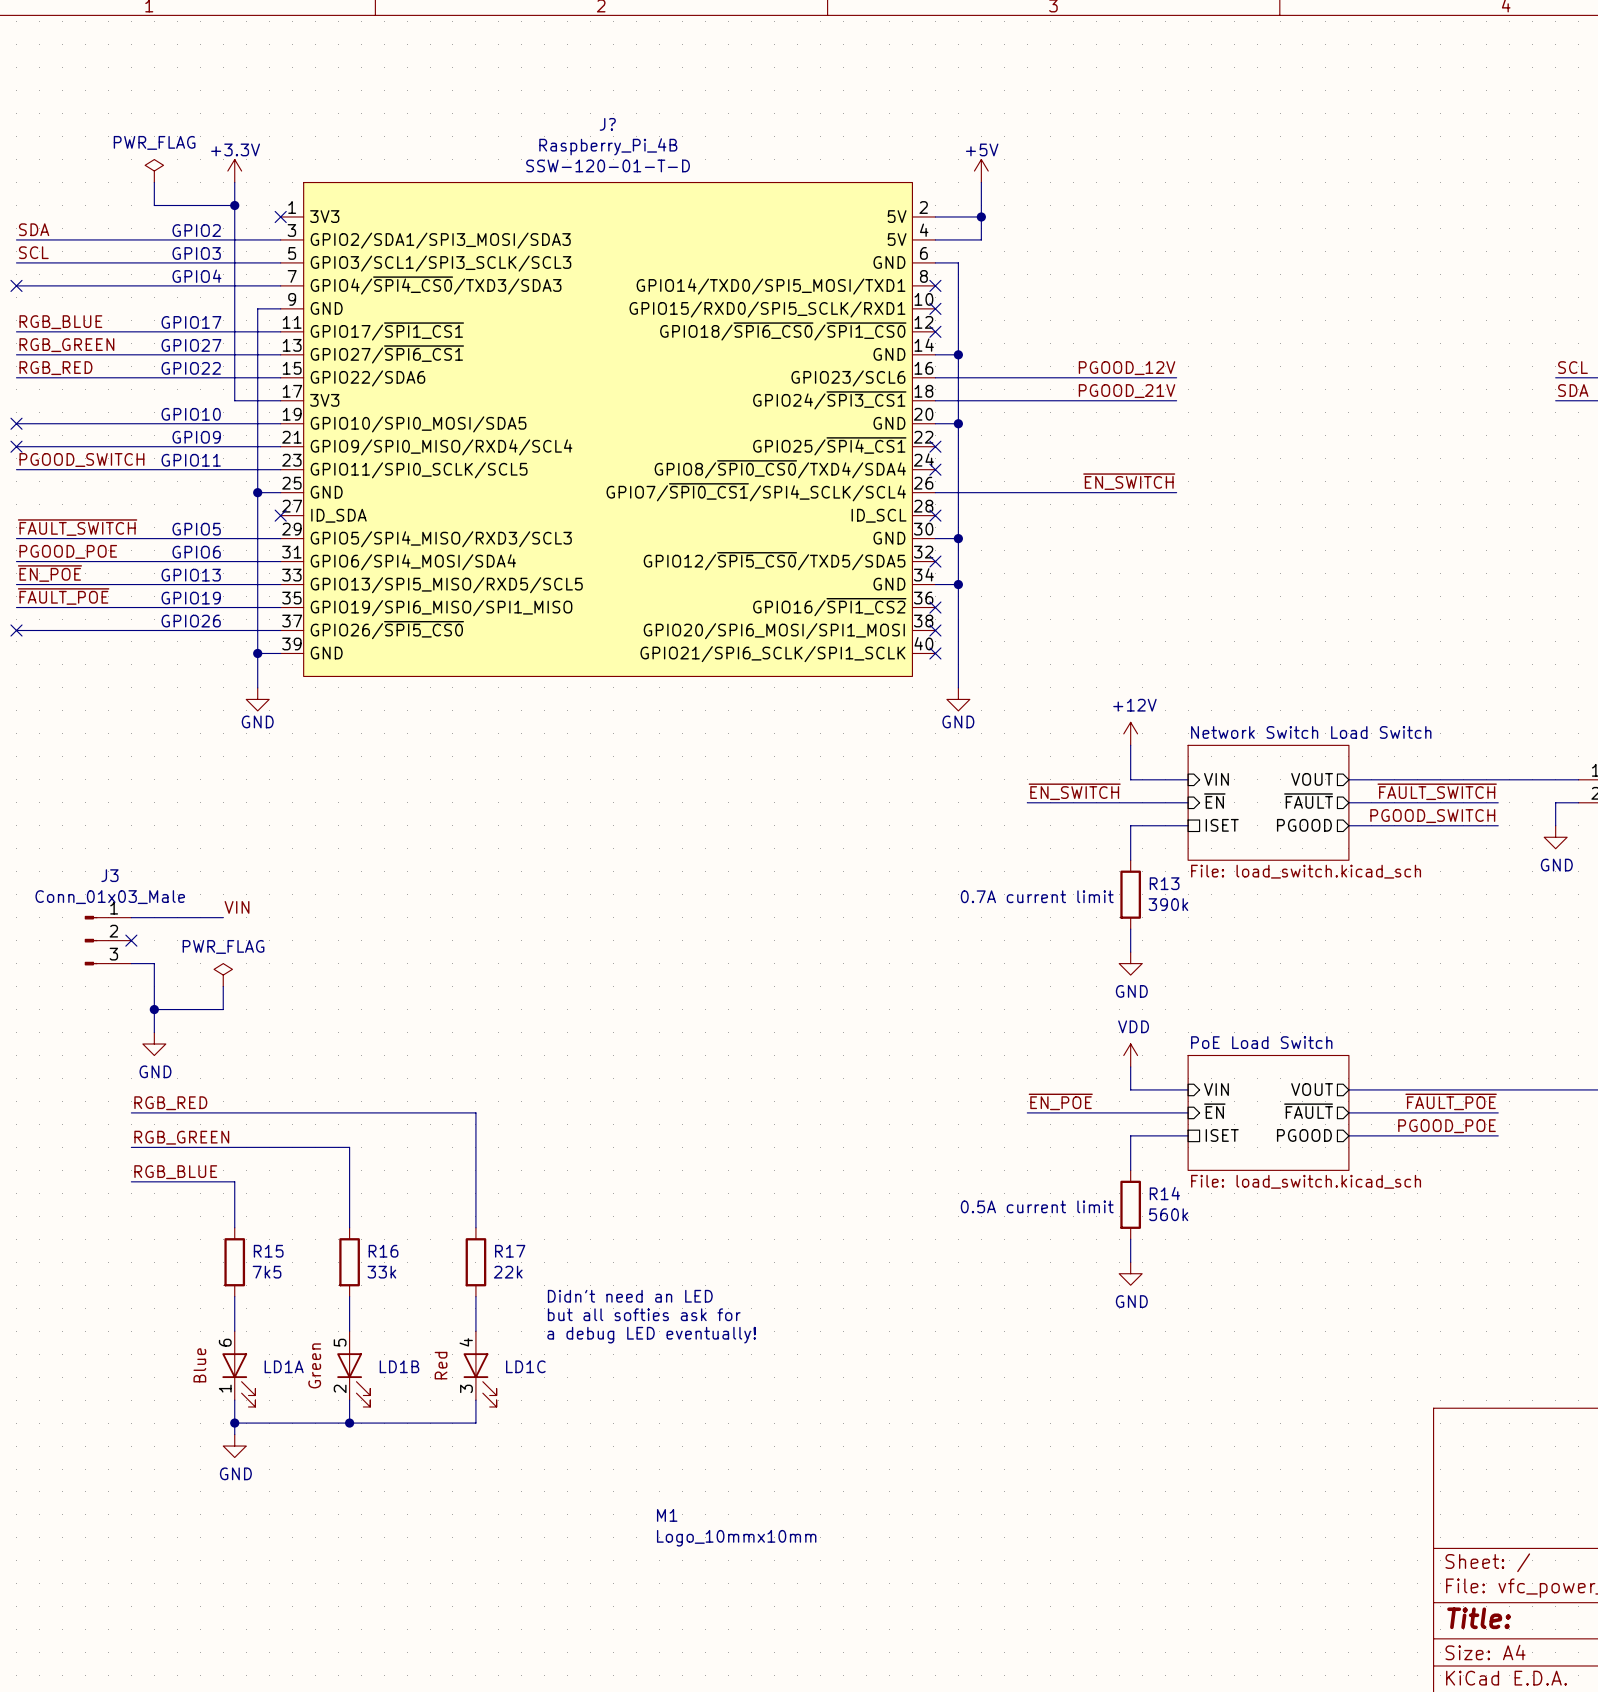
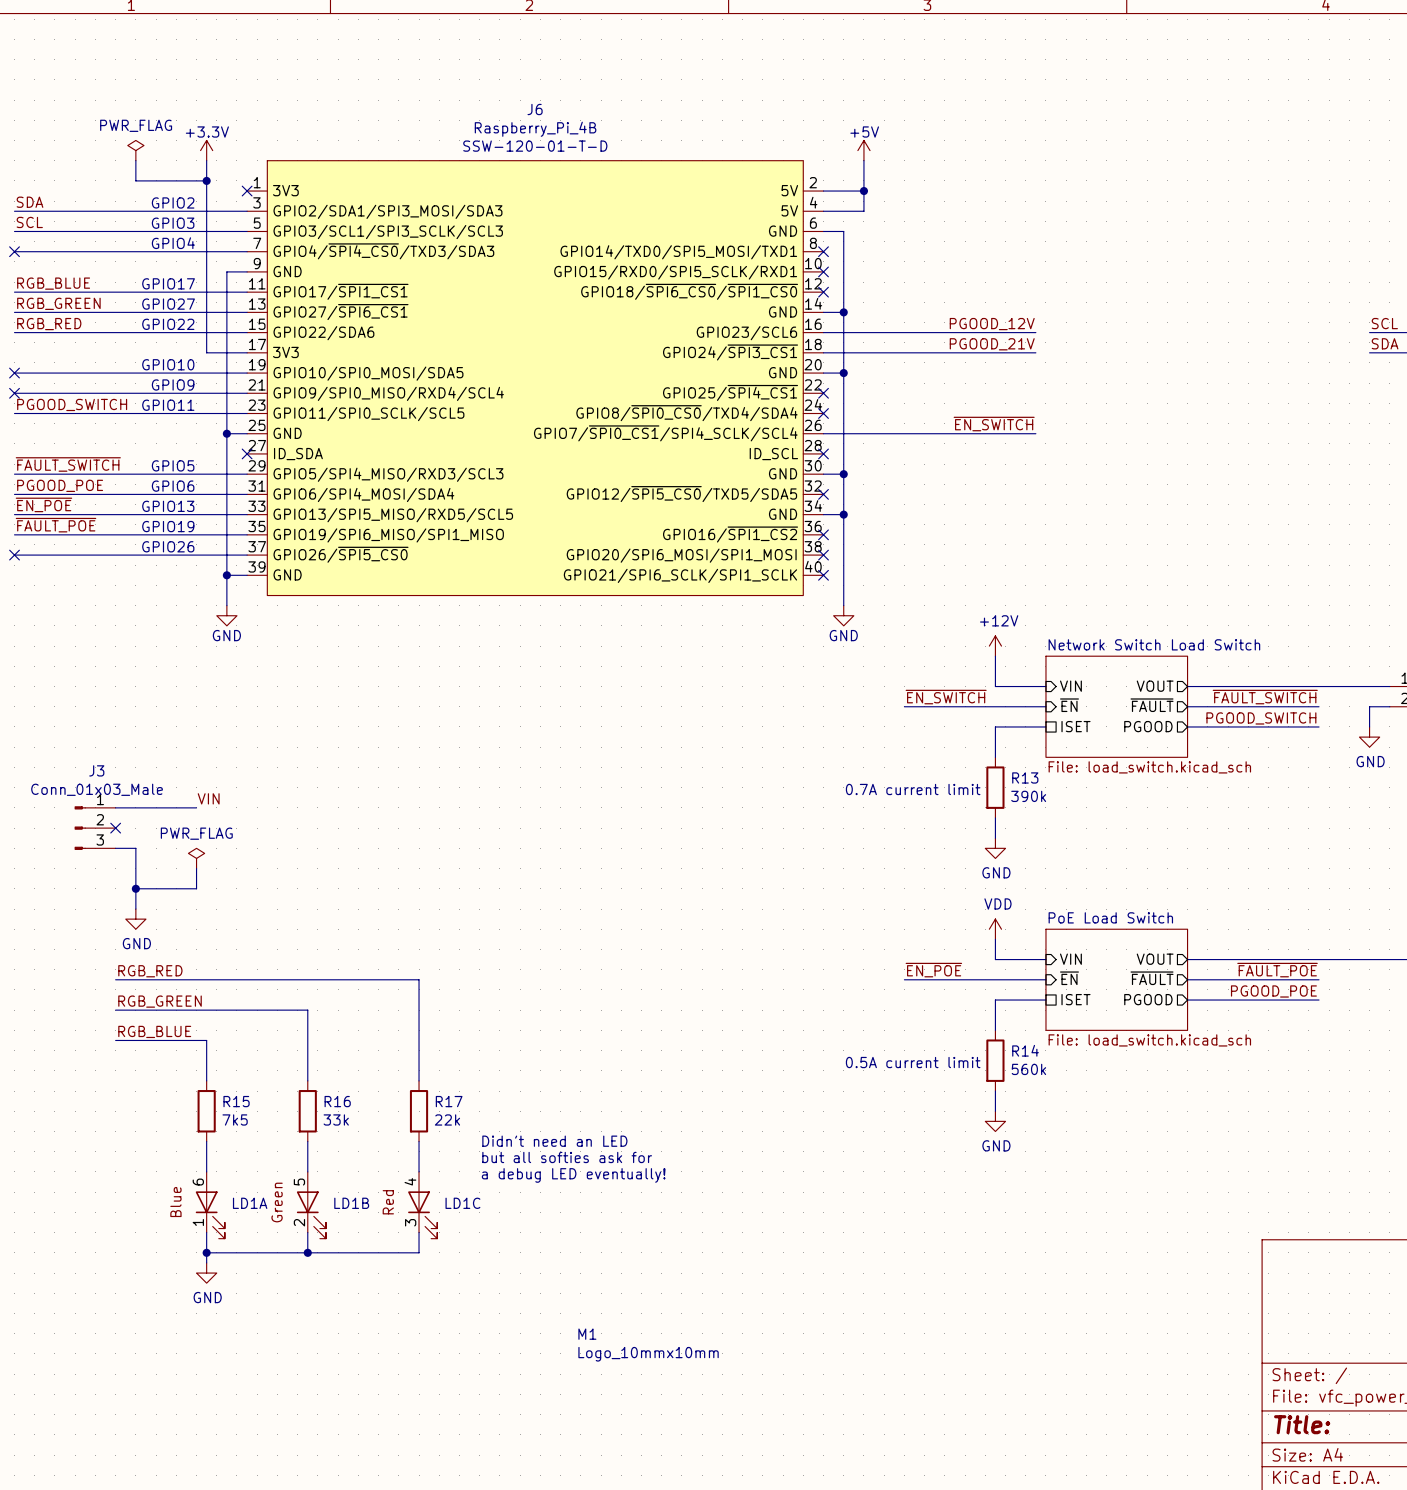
J? name: J? (607, 124) -> J6 (535, 109)

